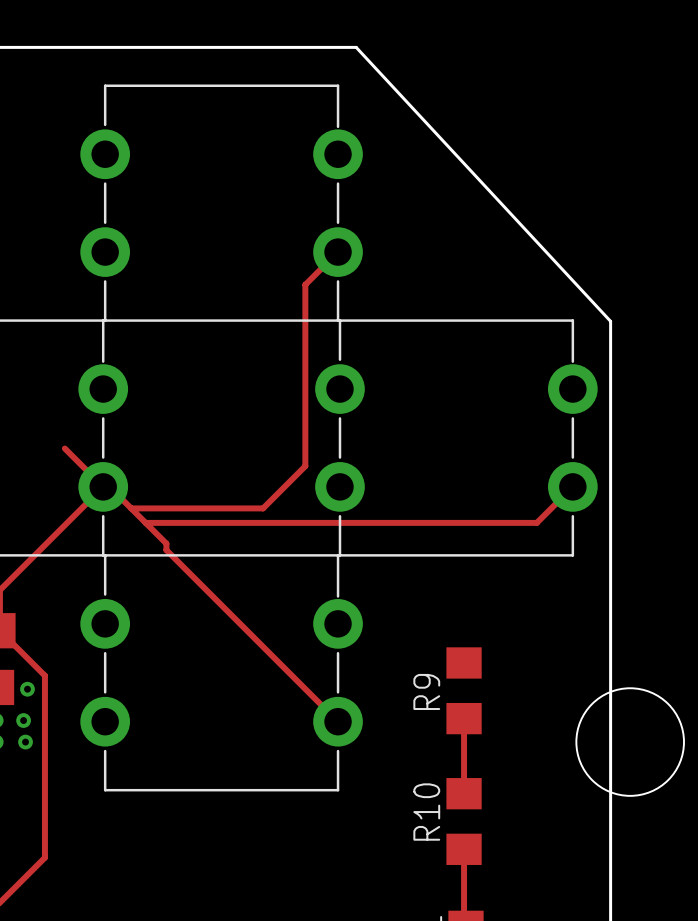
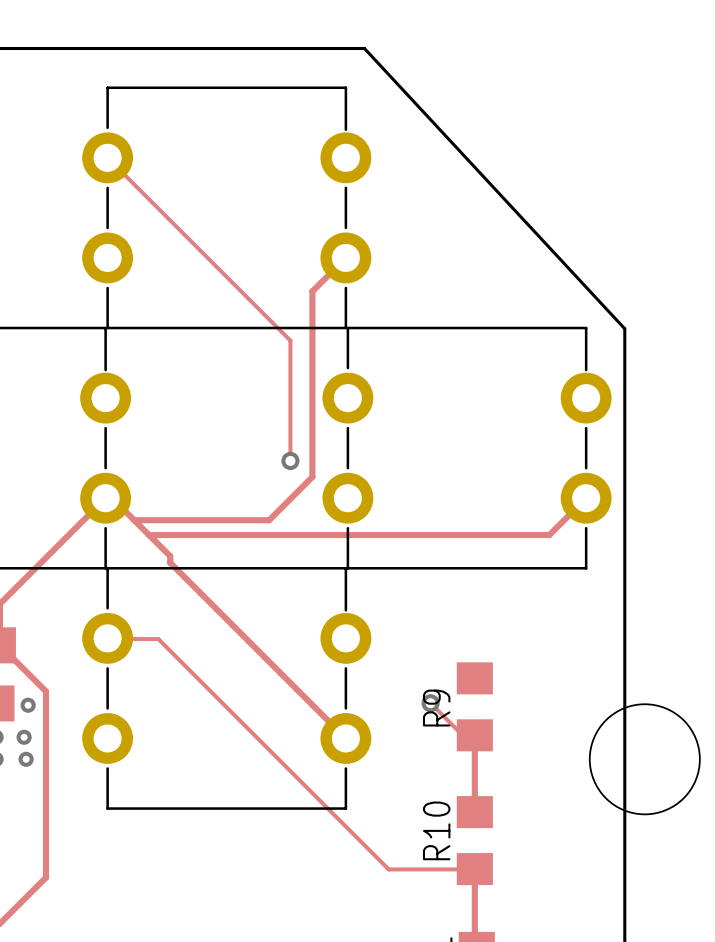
track: none -> (107, 157) (290, 340) (290, 460)
track: (64, 448) (103, 486) -> none
via: none -> (290, 460)
track: none -> (107, 638) (158, 639) (388, 869) (474, 869)
track: none -> (430, 703) (468, 741) (474, 741)
via: none -> (430, 703)

